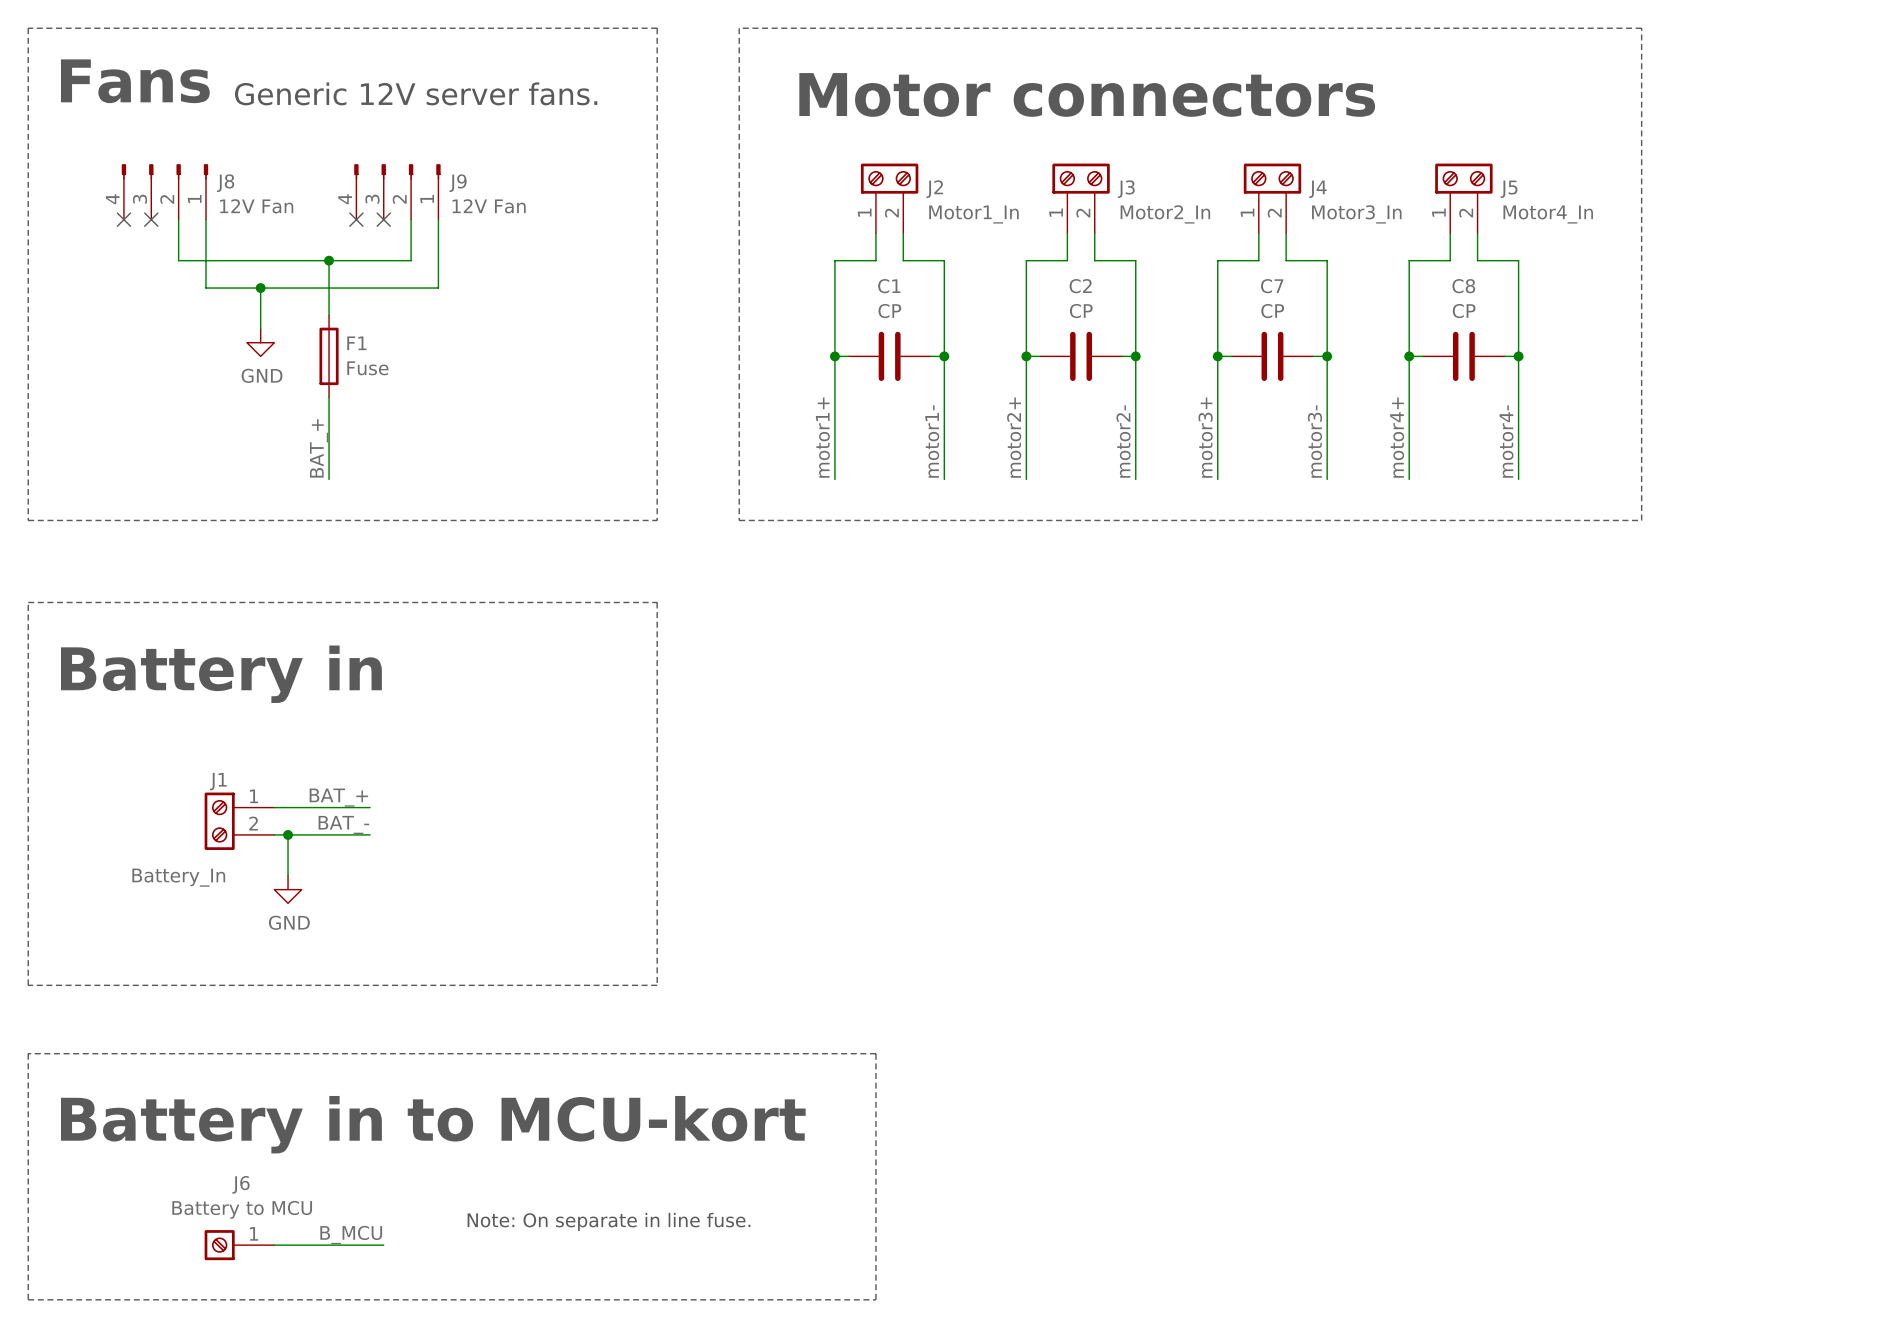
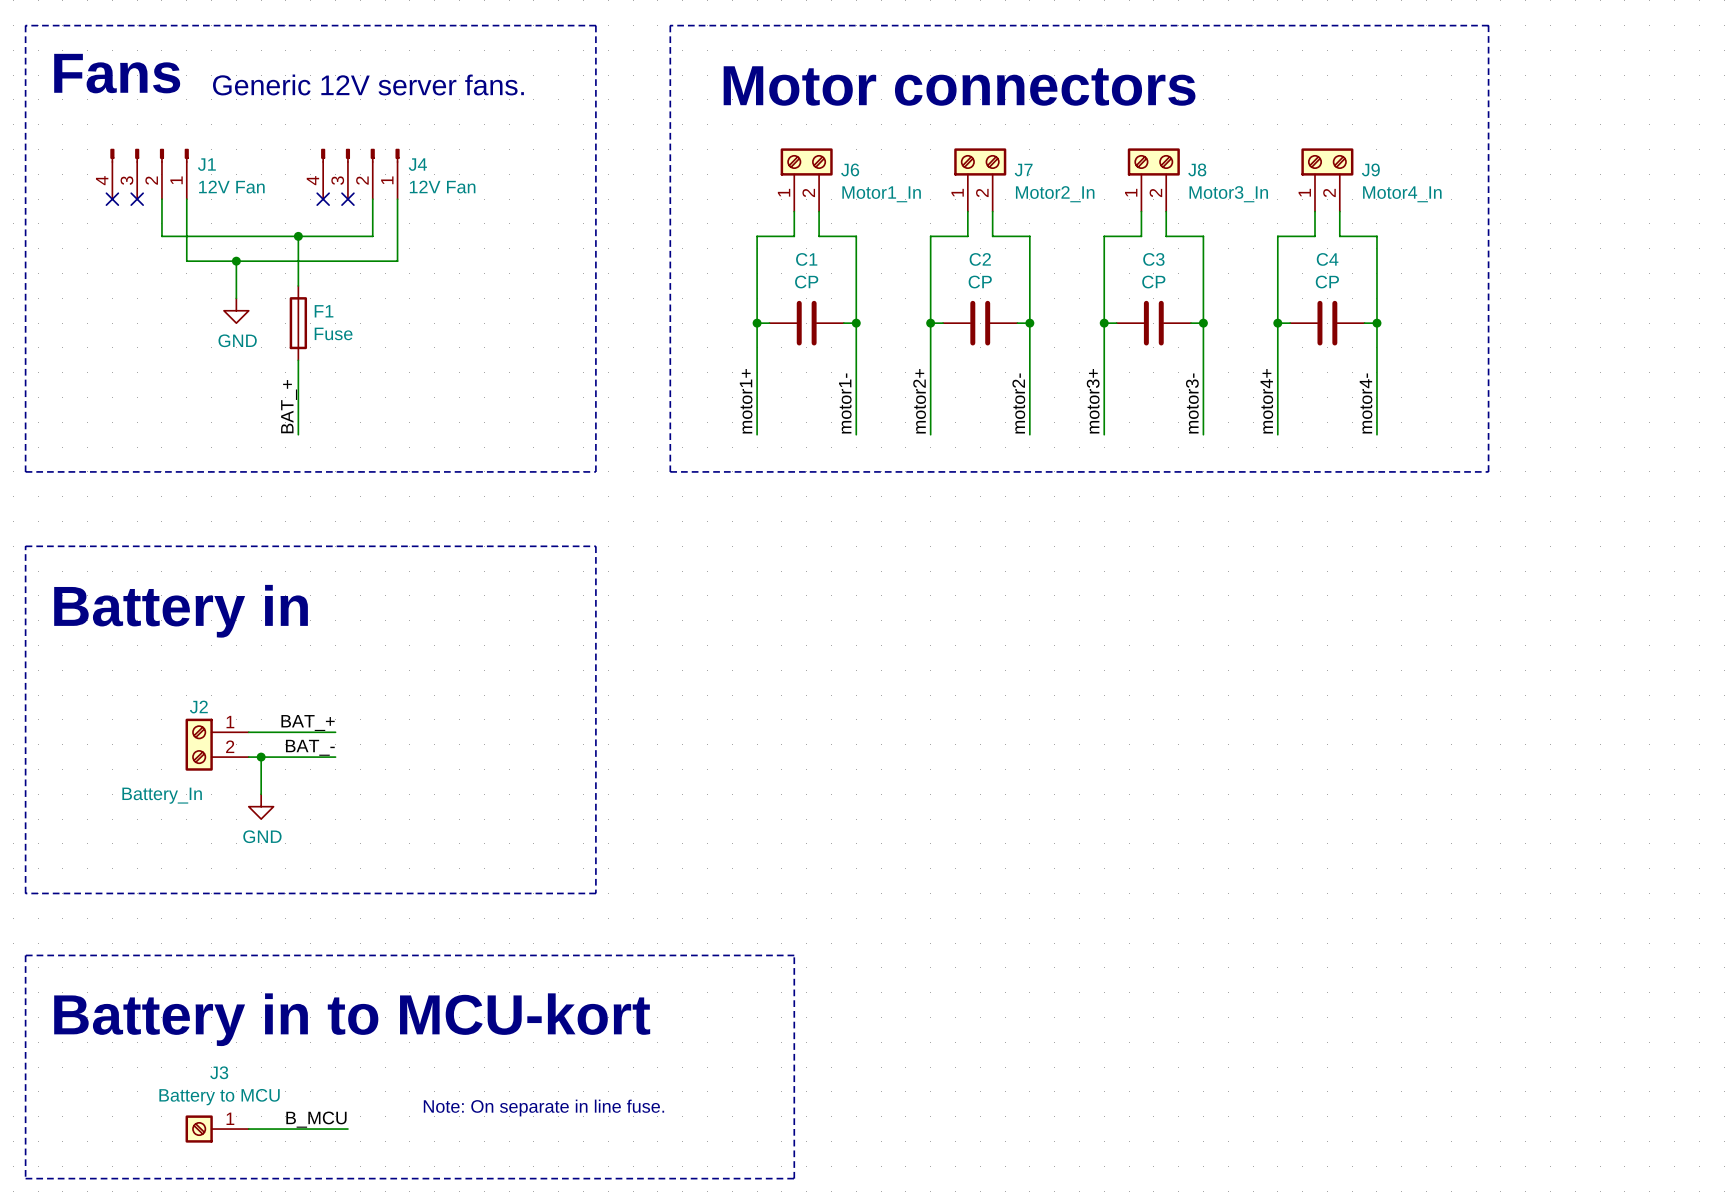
J8 name: J8 (225, 183) -> J1 (206, 164)
J9 name: J9 (458, 183) -> J4 (417, 164)
J2 name: J2 (934, 189) -> J6 (850, 169)
J3 name: J3 (1126, 189) -> J7 (1023, 170)
J4 name: J4 (1317, 189) -> J8 (1197, 169)
J5 name: J5 (1509, 189) -> J9 (1370, 169)
C7 name: C7 (1272, 286) -> C3 (1153, 259)
C8 name: C8 (1463, 286) -> C4 (1327, 259)
J1 name: J1 (218, 781) -> J2 (198, 707)
J6 name: J6 (241, 1184) -> J3 (219, 1072)

